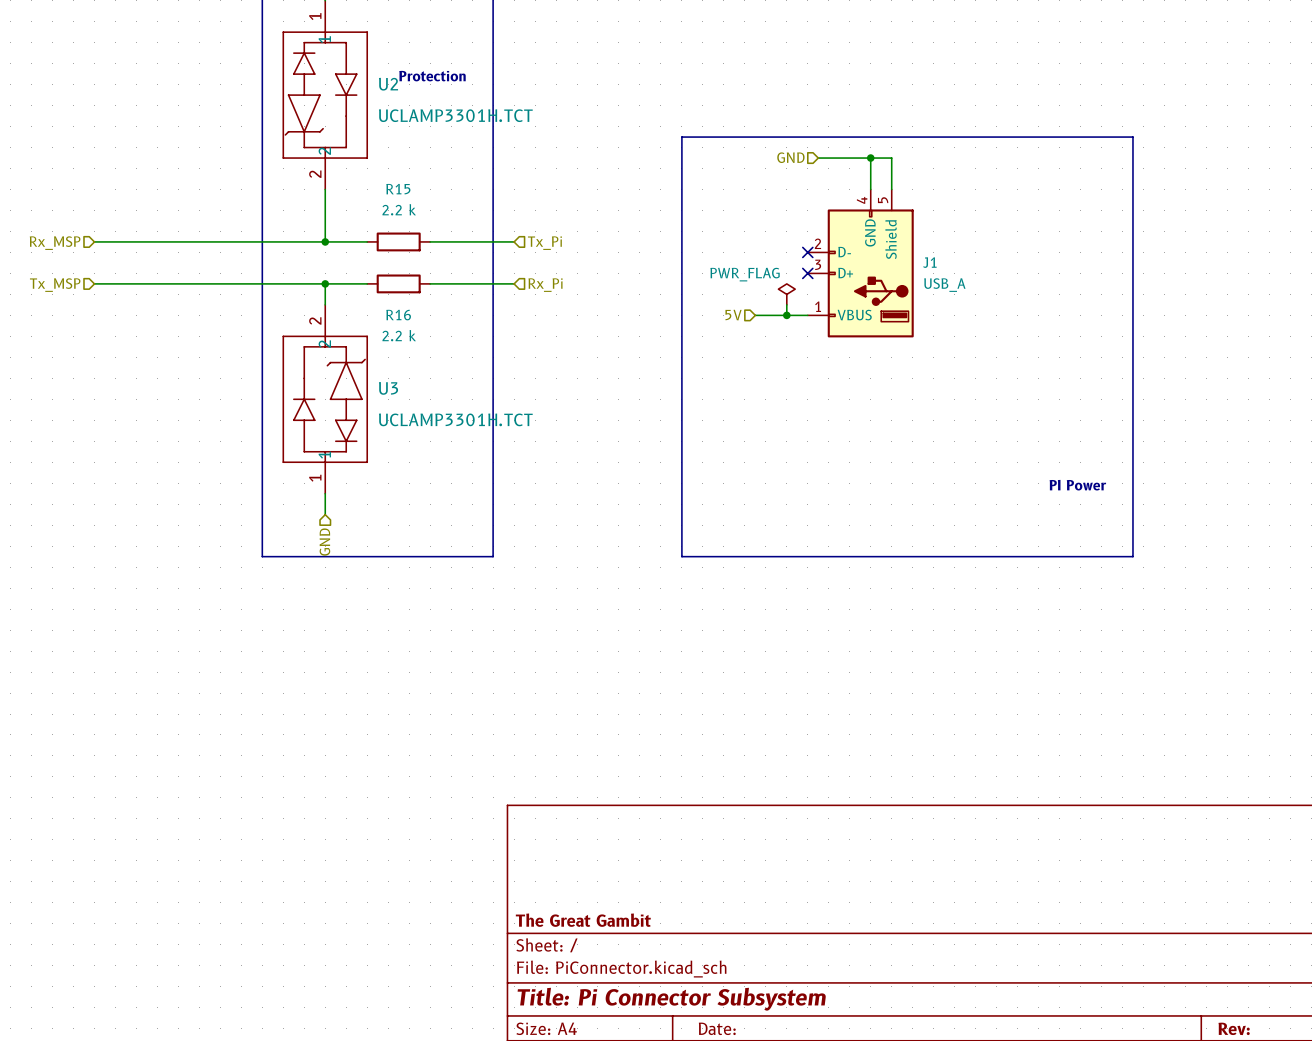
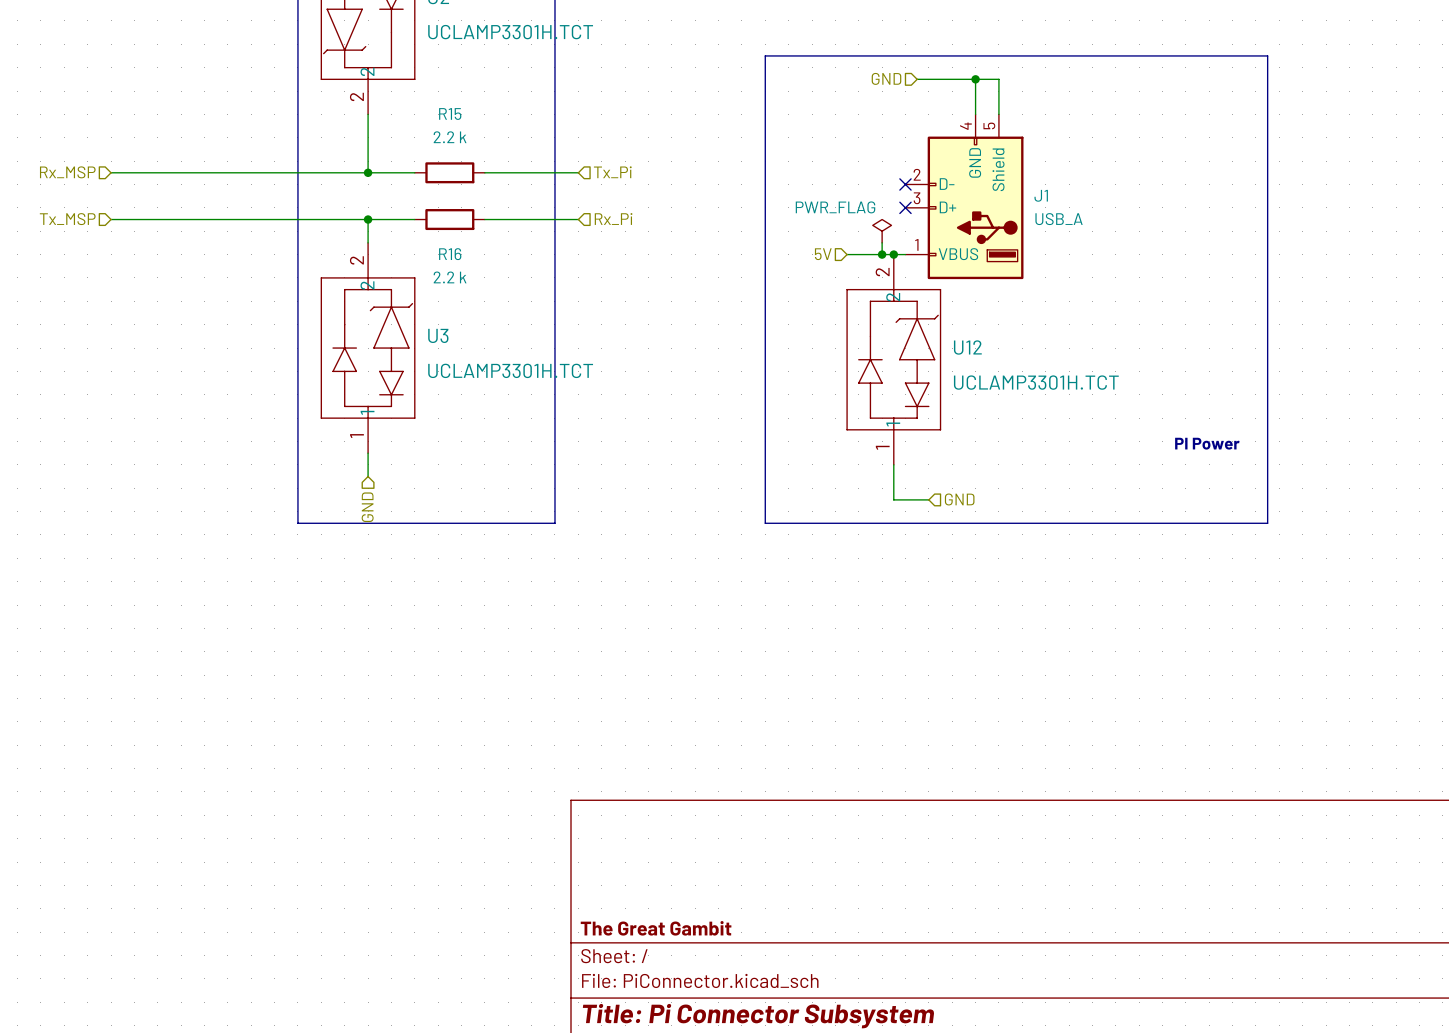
junction: none -> (893, 254)
U12: none -> UCLAMP3301H.TCT (893, 359)
wire: none -> (893, 464) (893, 499) (928, 499)
hierarchical label: none -> GND (959, 499)

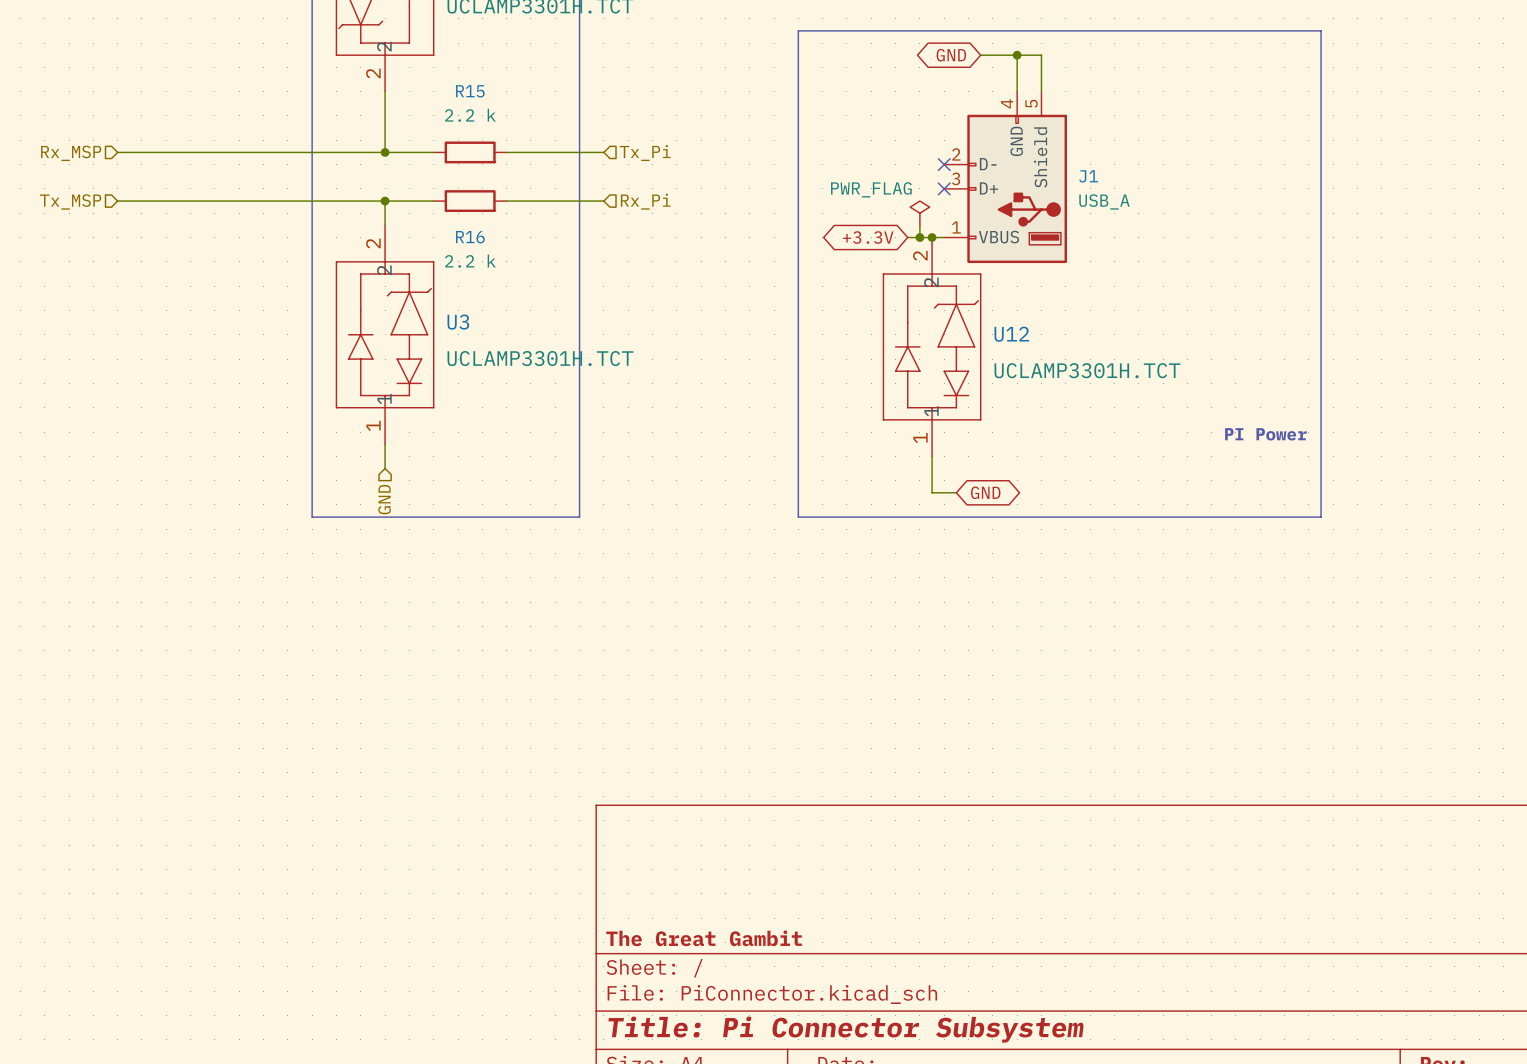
hierarchical label: GND (886, 78) -> none
global label: none -> GND (951, 55)
wire: (917, 79) (940, 79) -> none
hierarchical label: 5V (823, 254) -> none
global label: none -> +3.3V (868, 237)
wire: (847, 254) (870, 254) -> none
wire: (917, 499) (928, 499) -> none
global label: none -> GND (985, 492)
hierarchical label: GND (959, 499) -> none

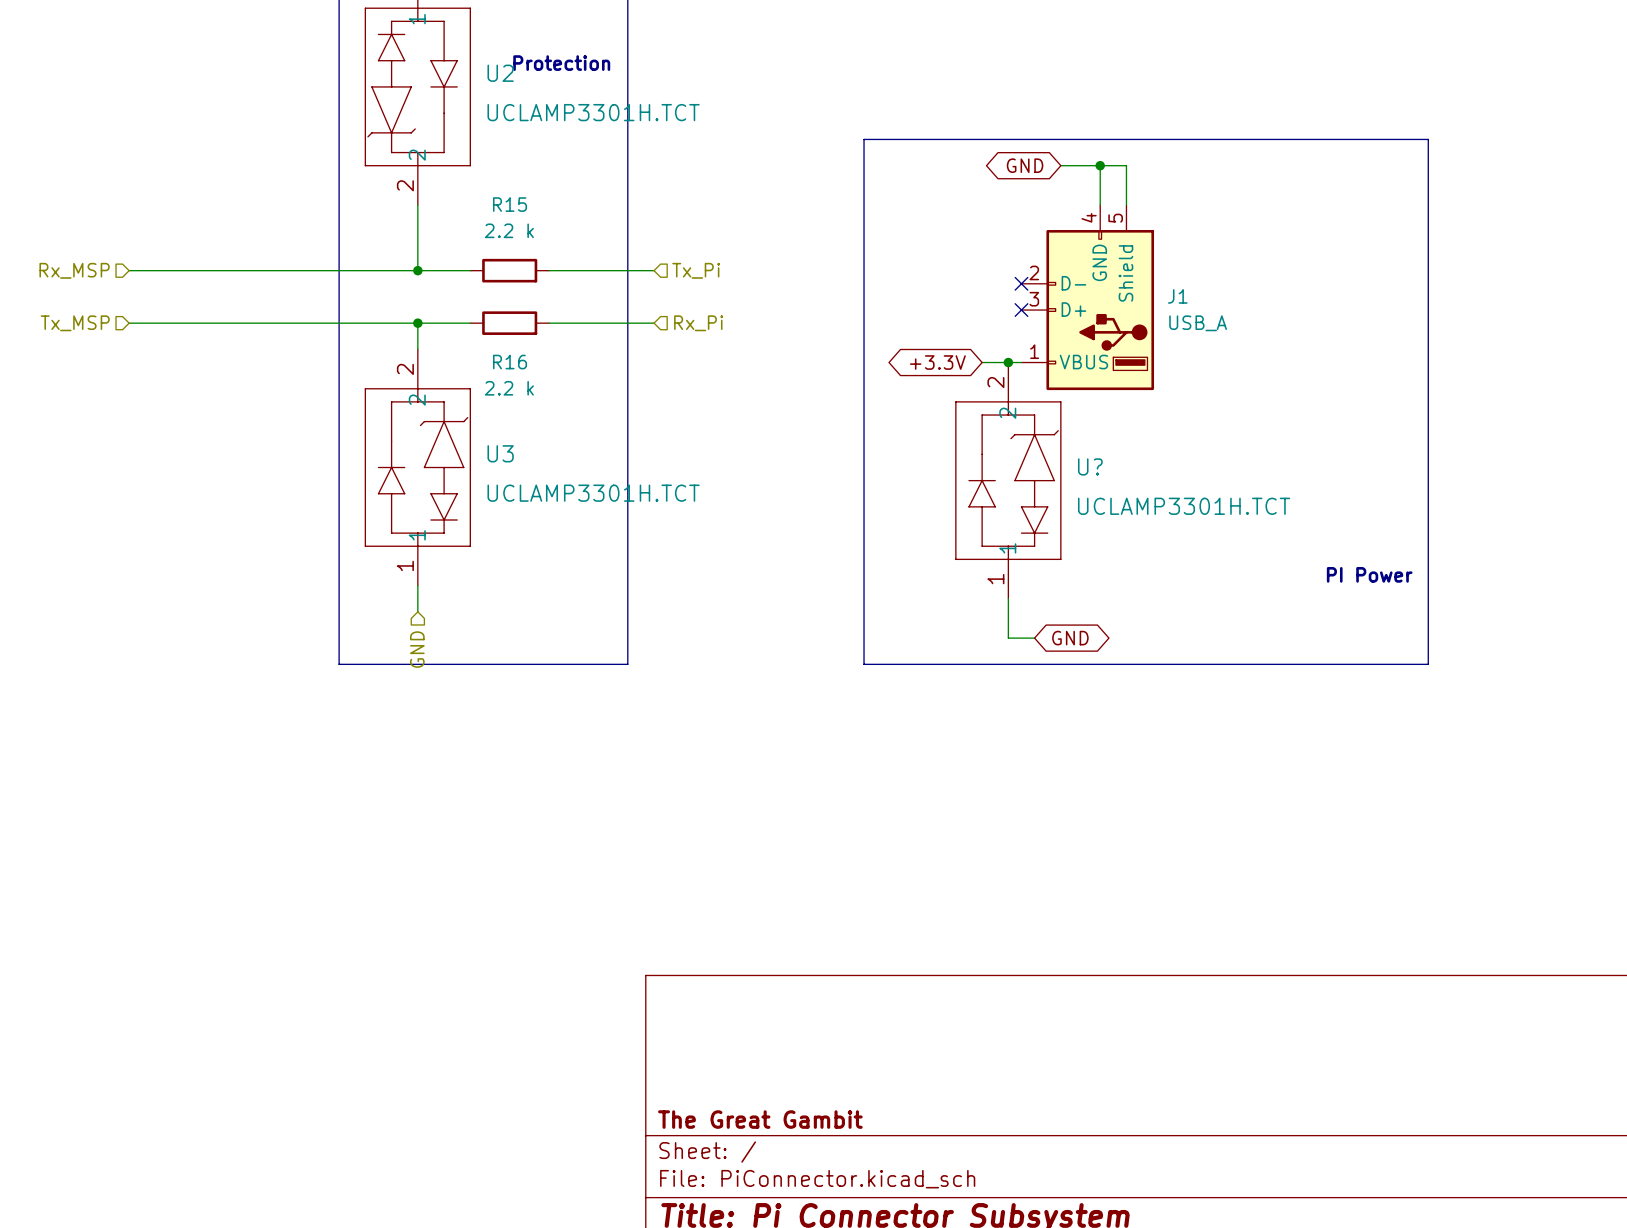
power symbol: PWR_FLAG (919, 213) -> none
wire: (919, 225) (919, 237) -> none
junction: (919, 237) -> none
U12 name: U12 (1011, 334) -> U? (1090, 466)

